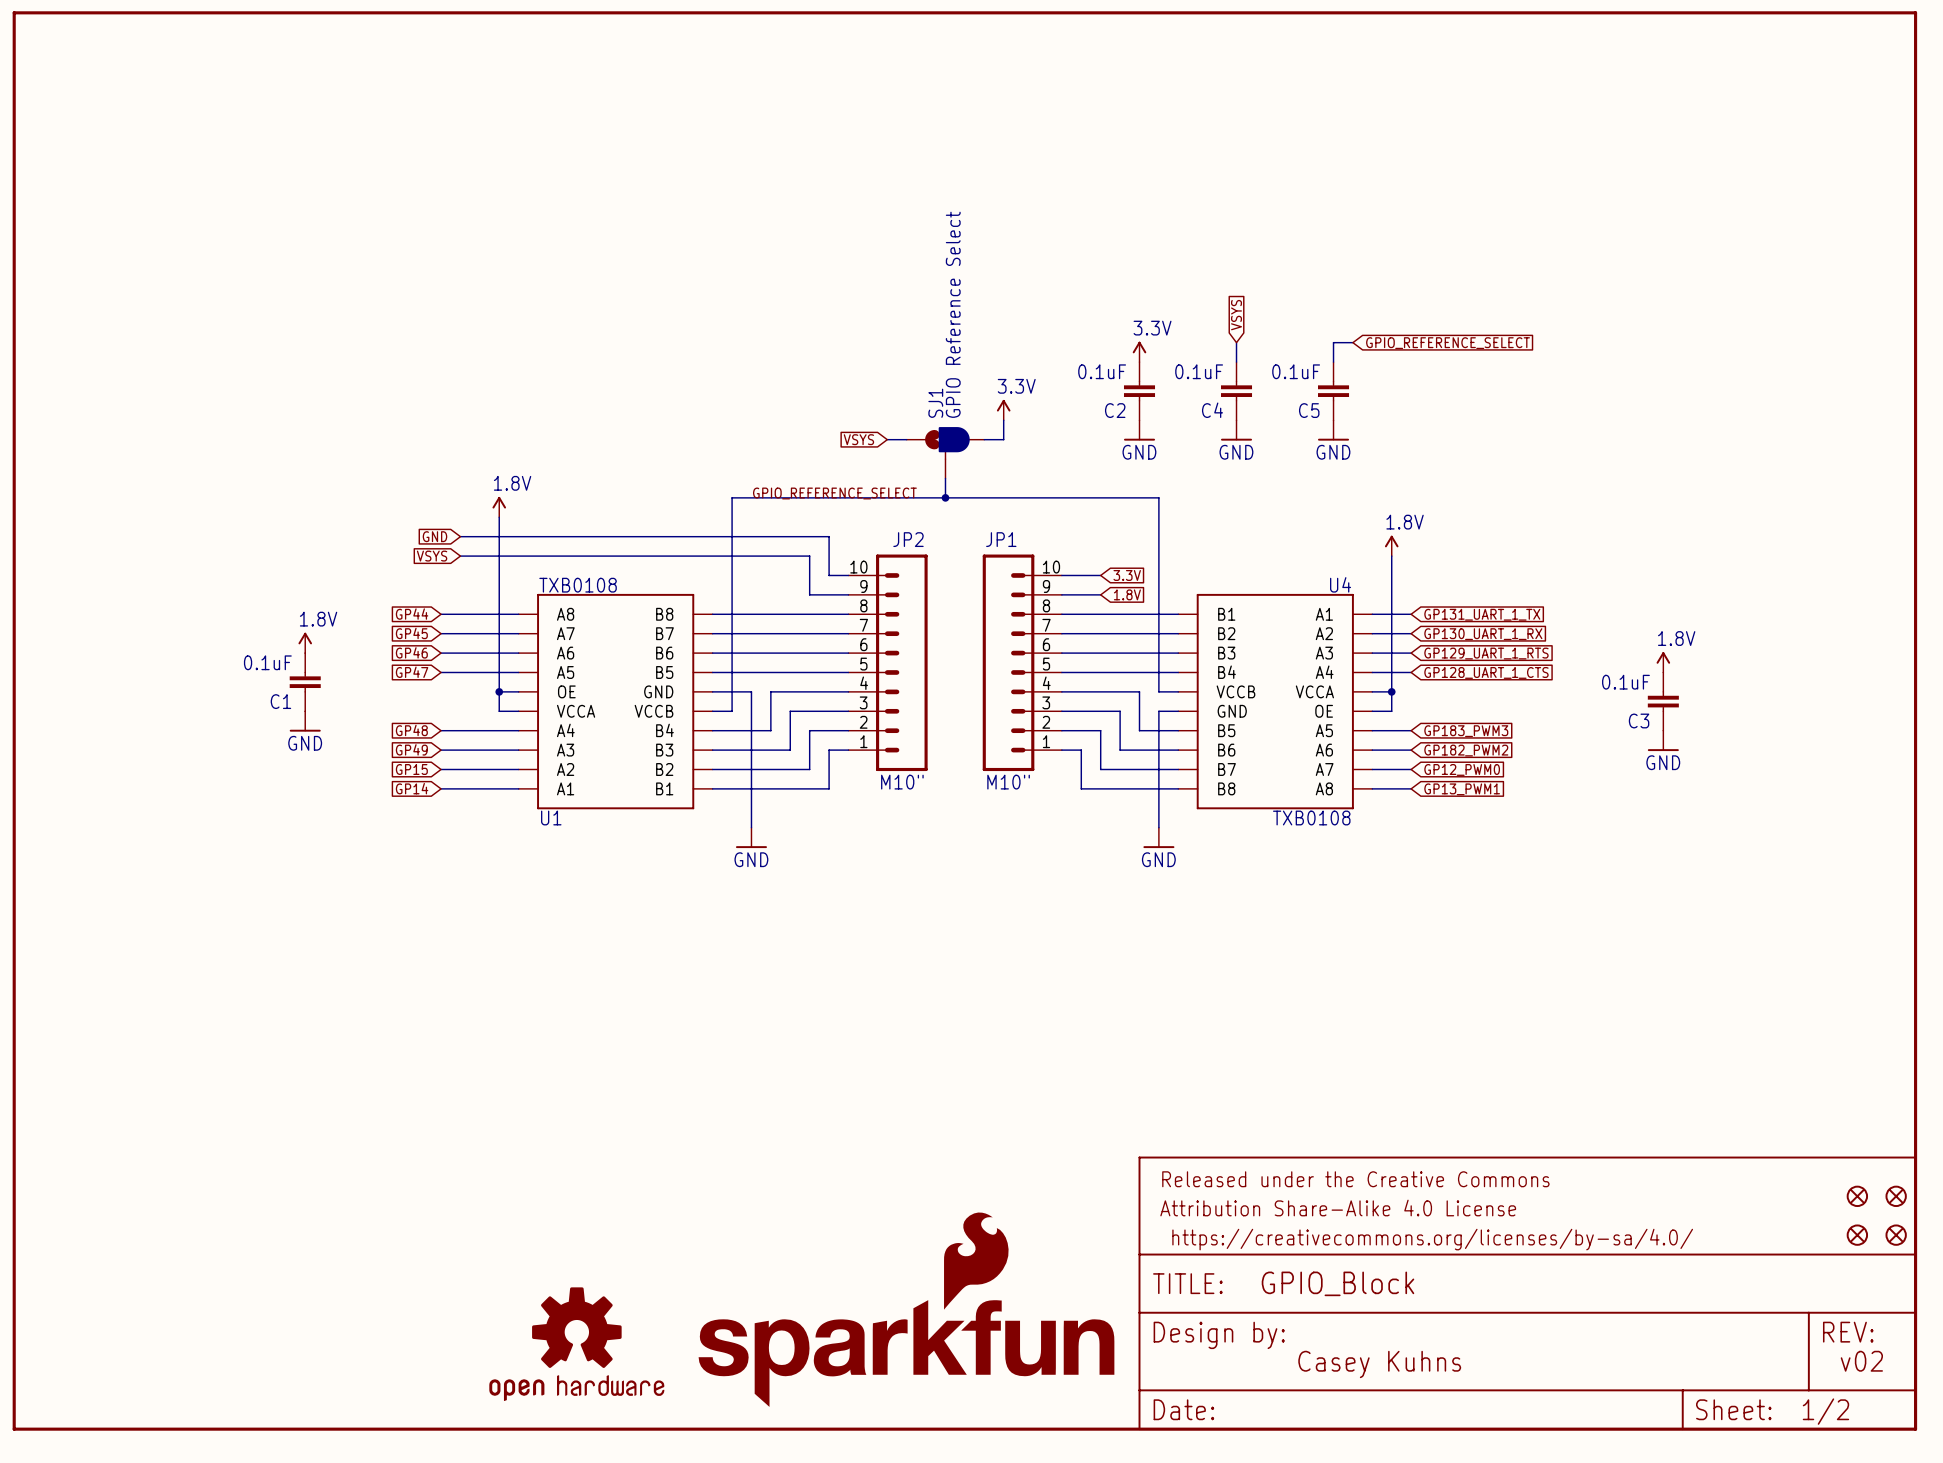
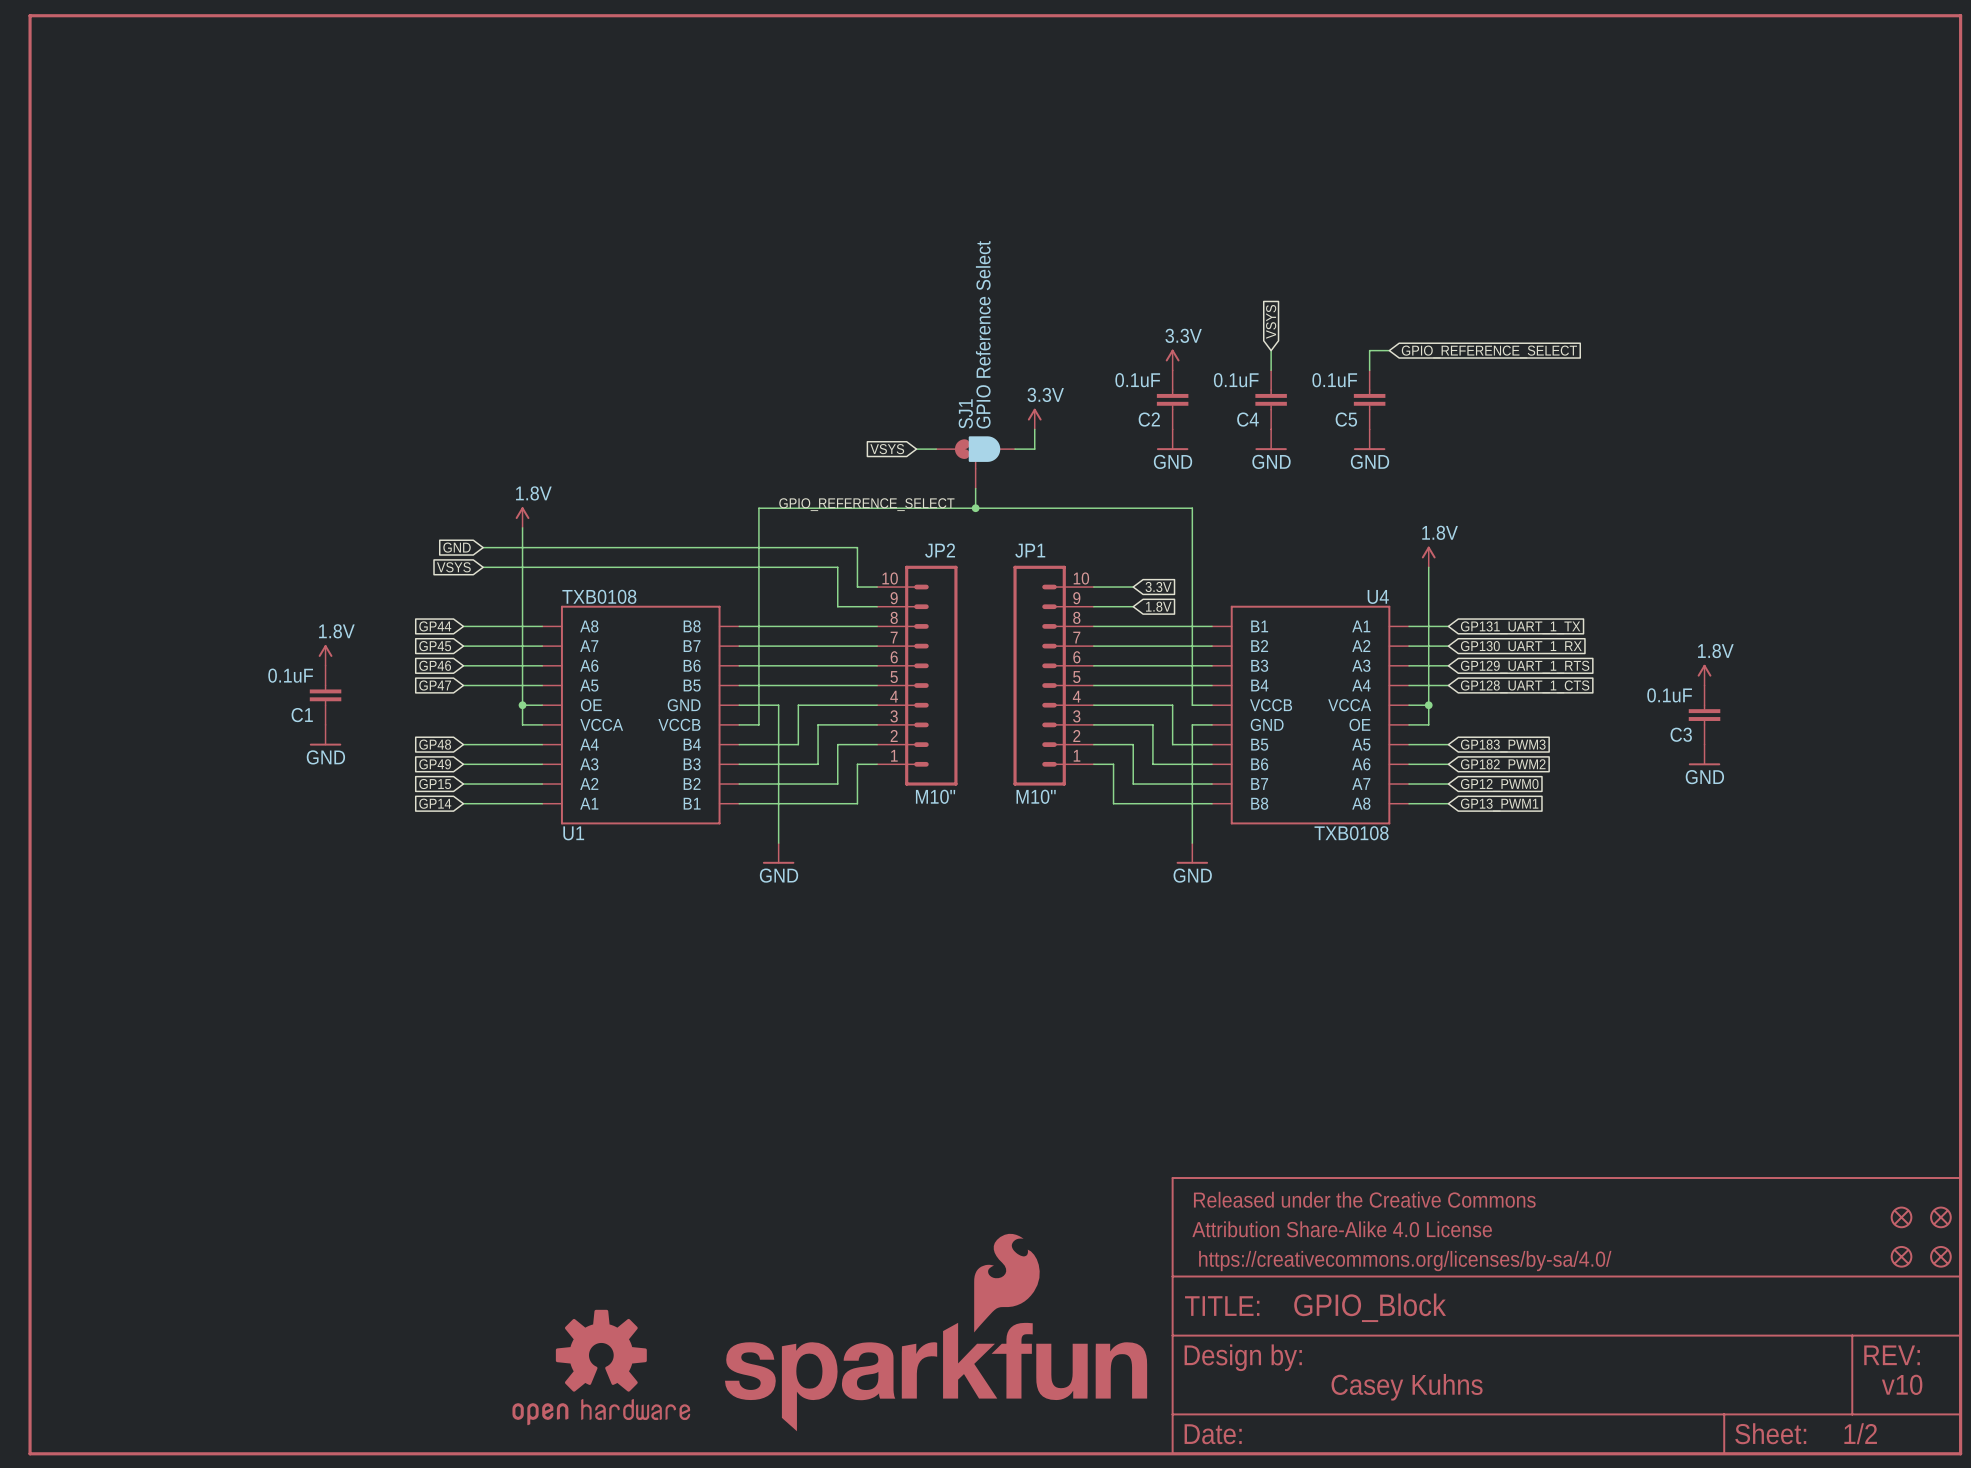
text: v02 (1861, 1361) -> v10 (1902, 1384)

